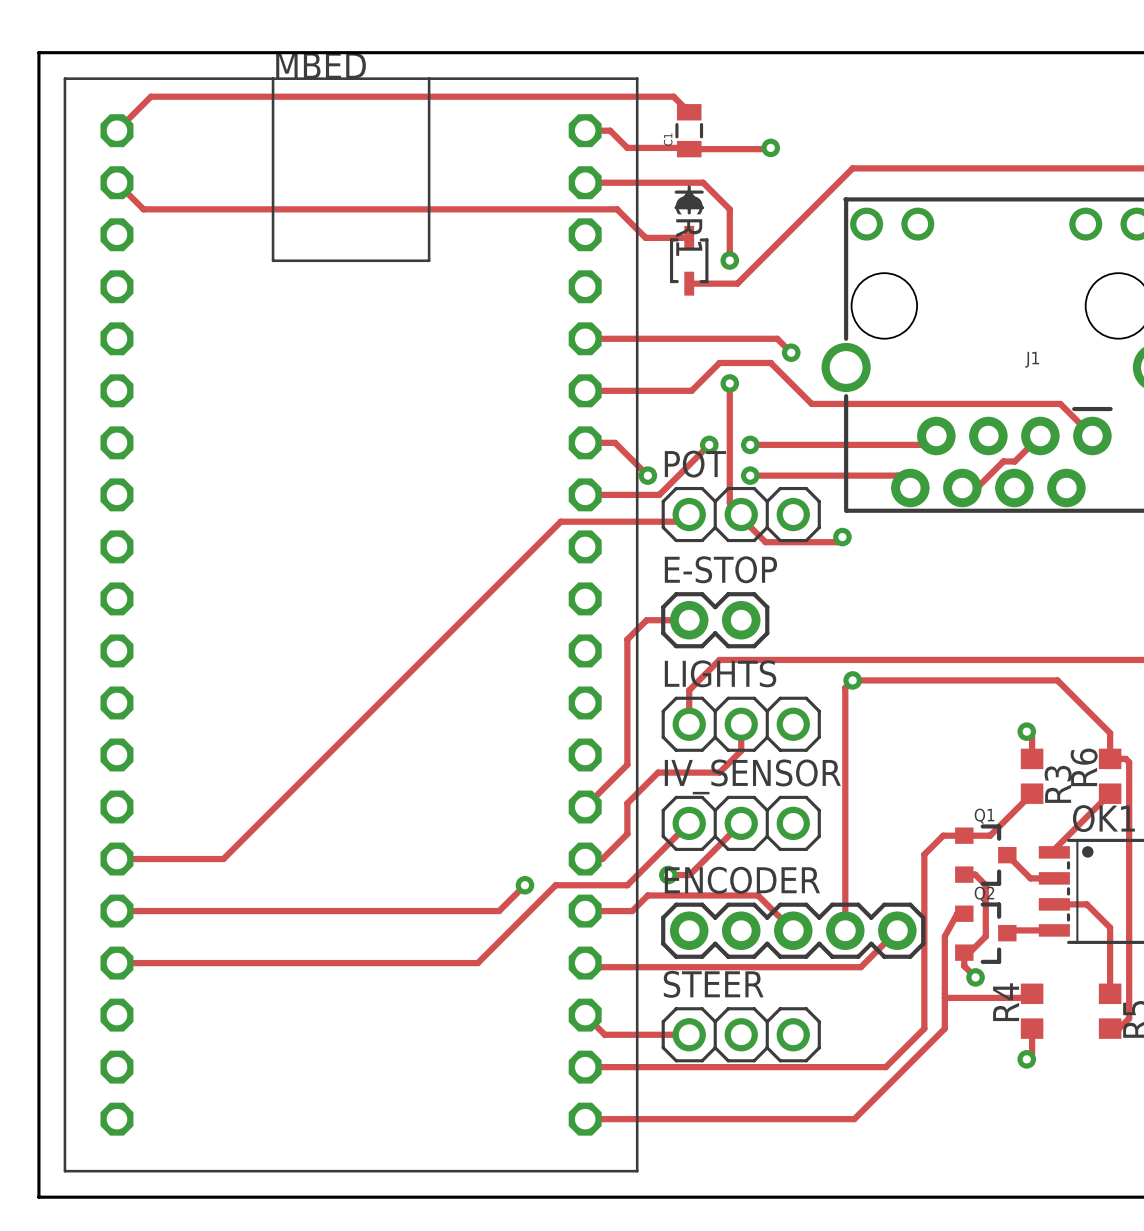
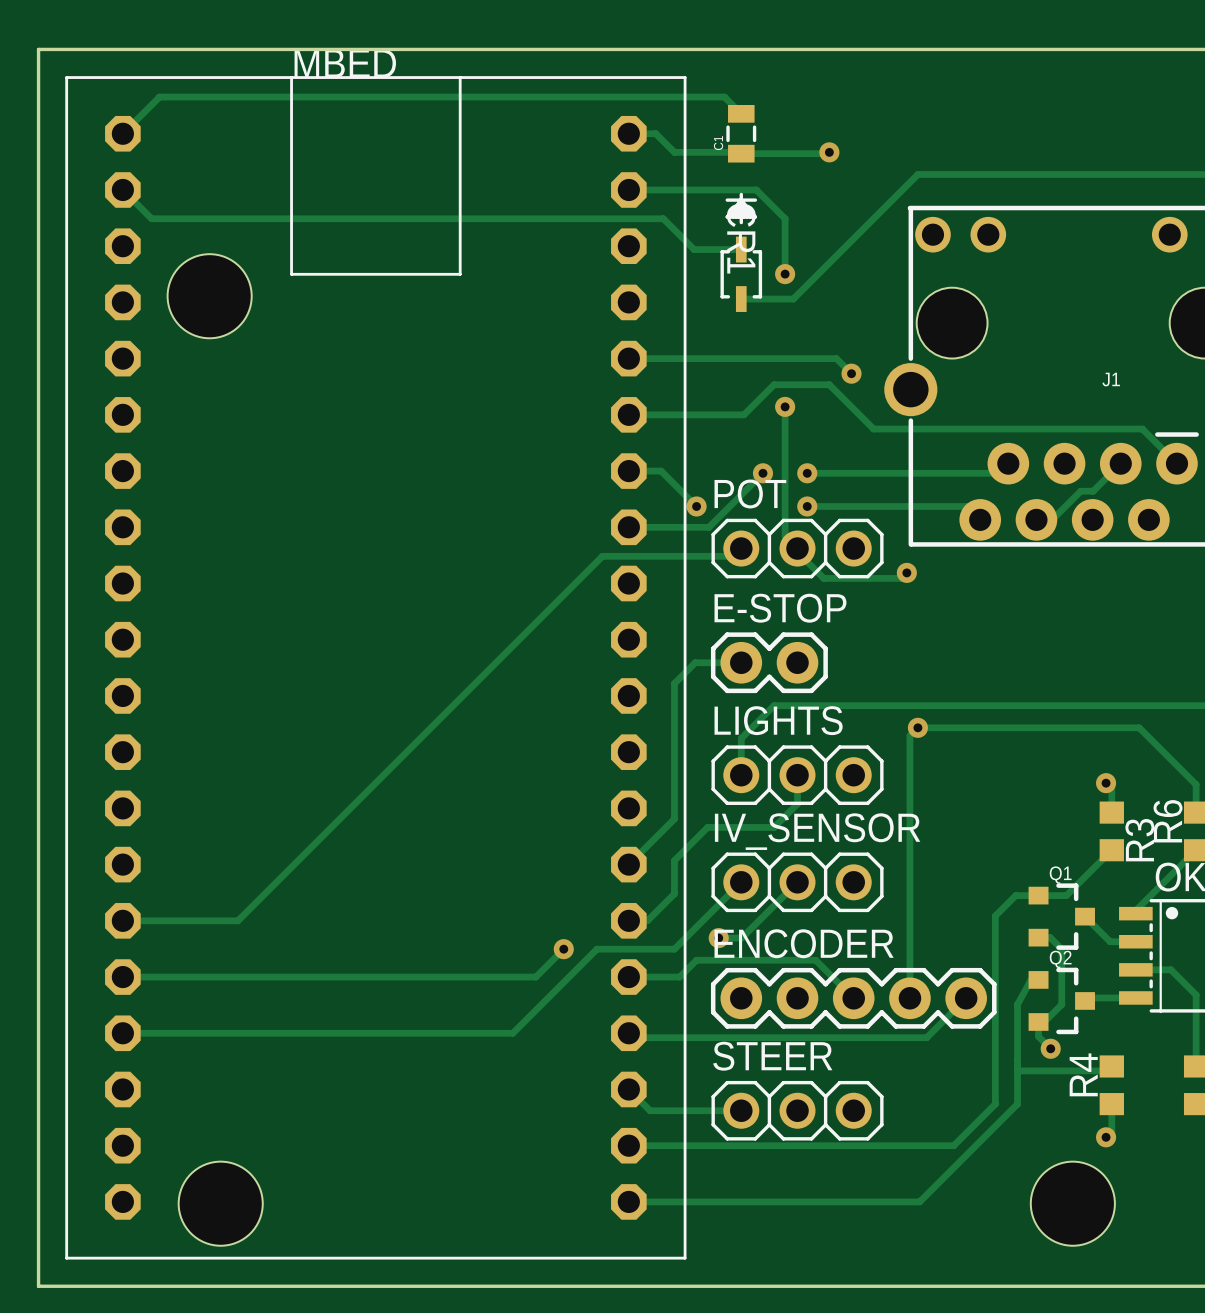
hole: none -> (209, 296)
hole: none -> (220, 1203)
hole: none -> (1072, 1203)

